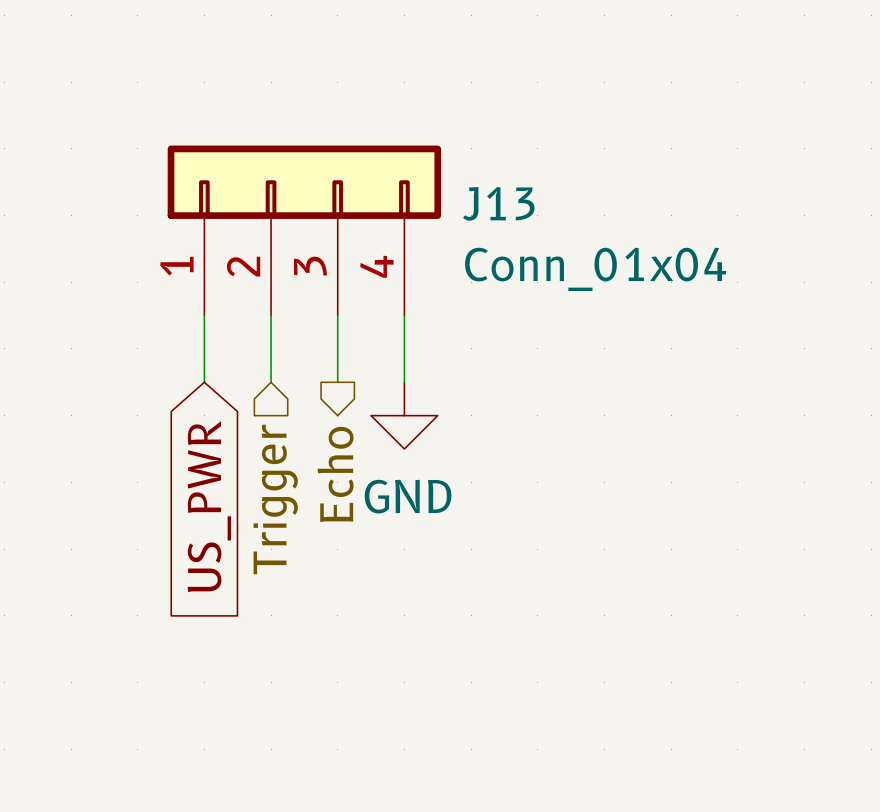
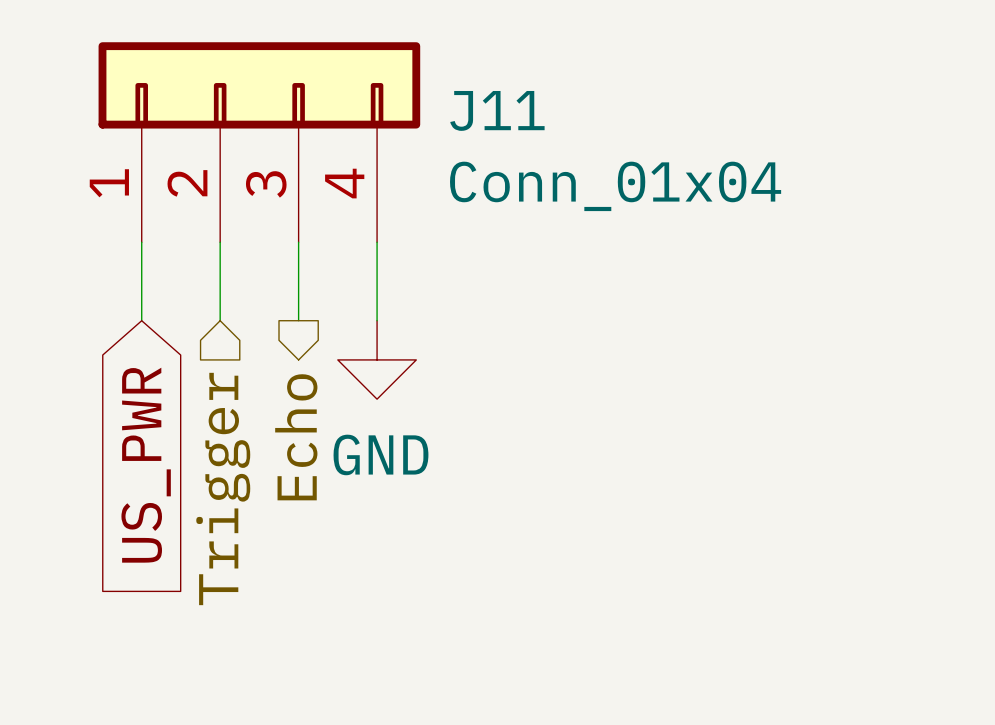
J13 name: J13 (498, 203) -> J11 (497, 110)

